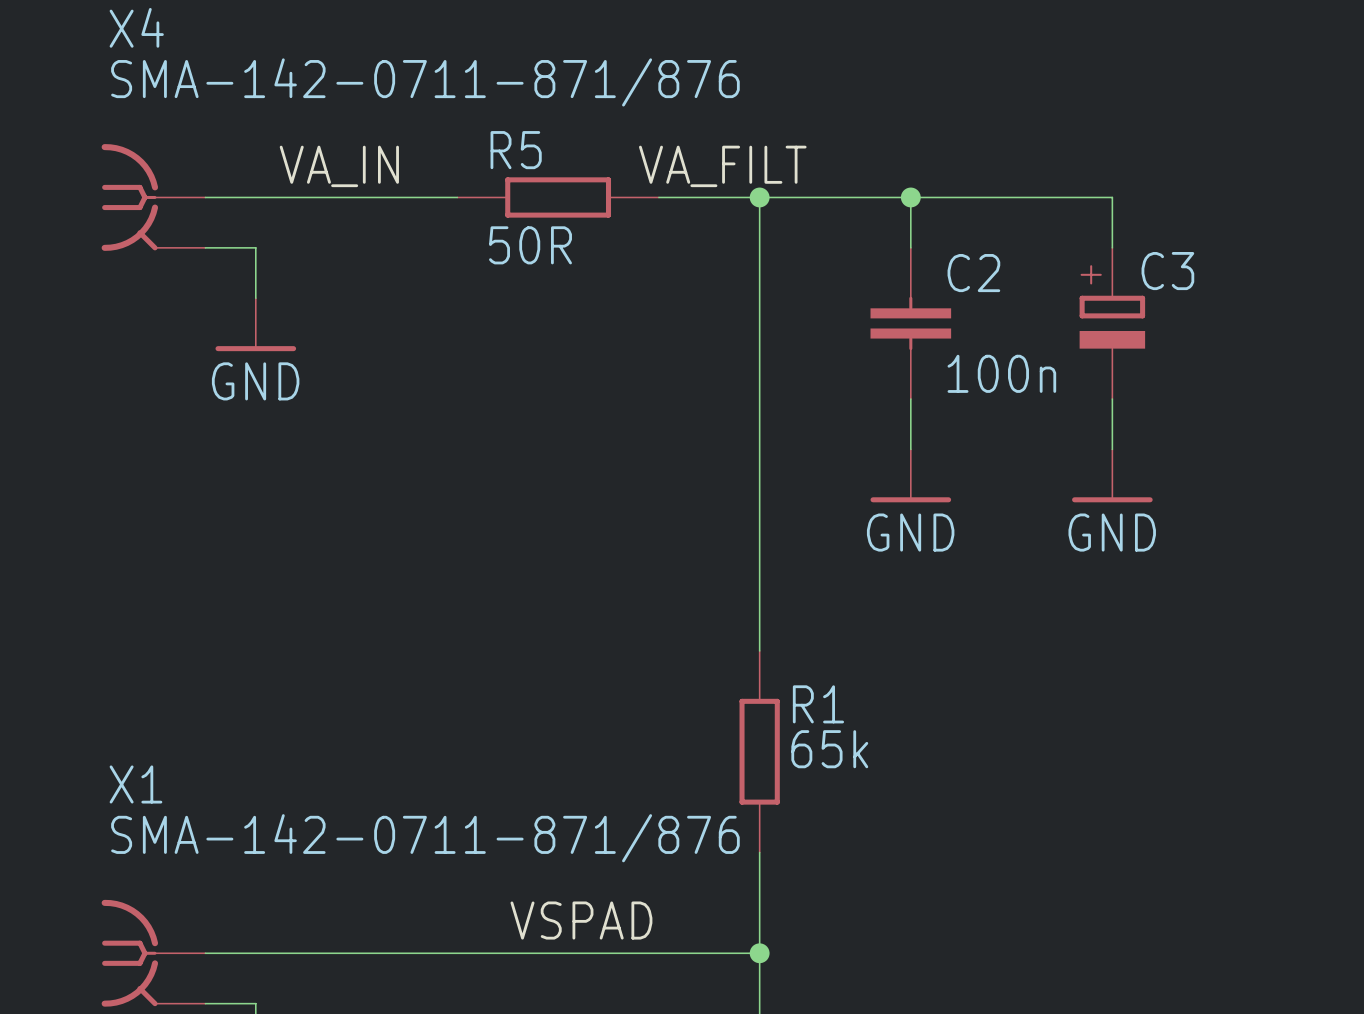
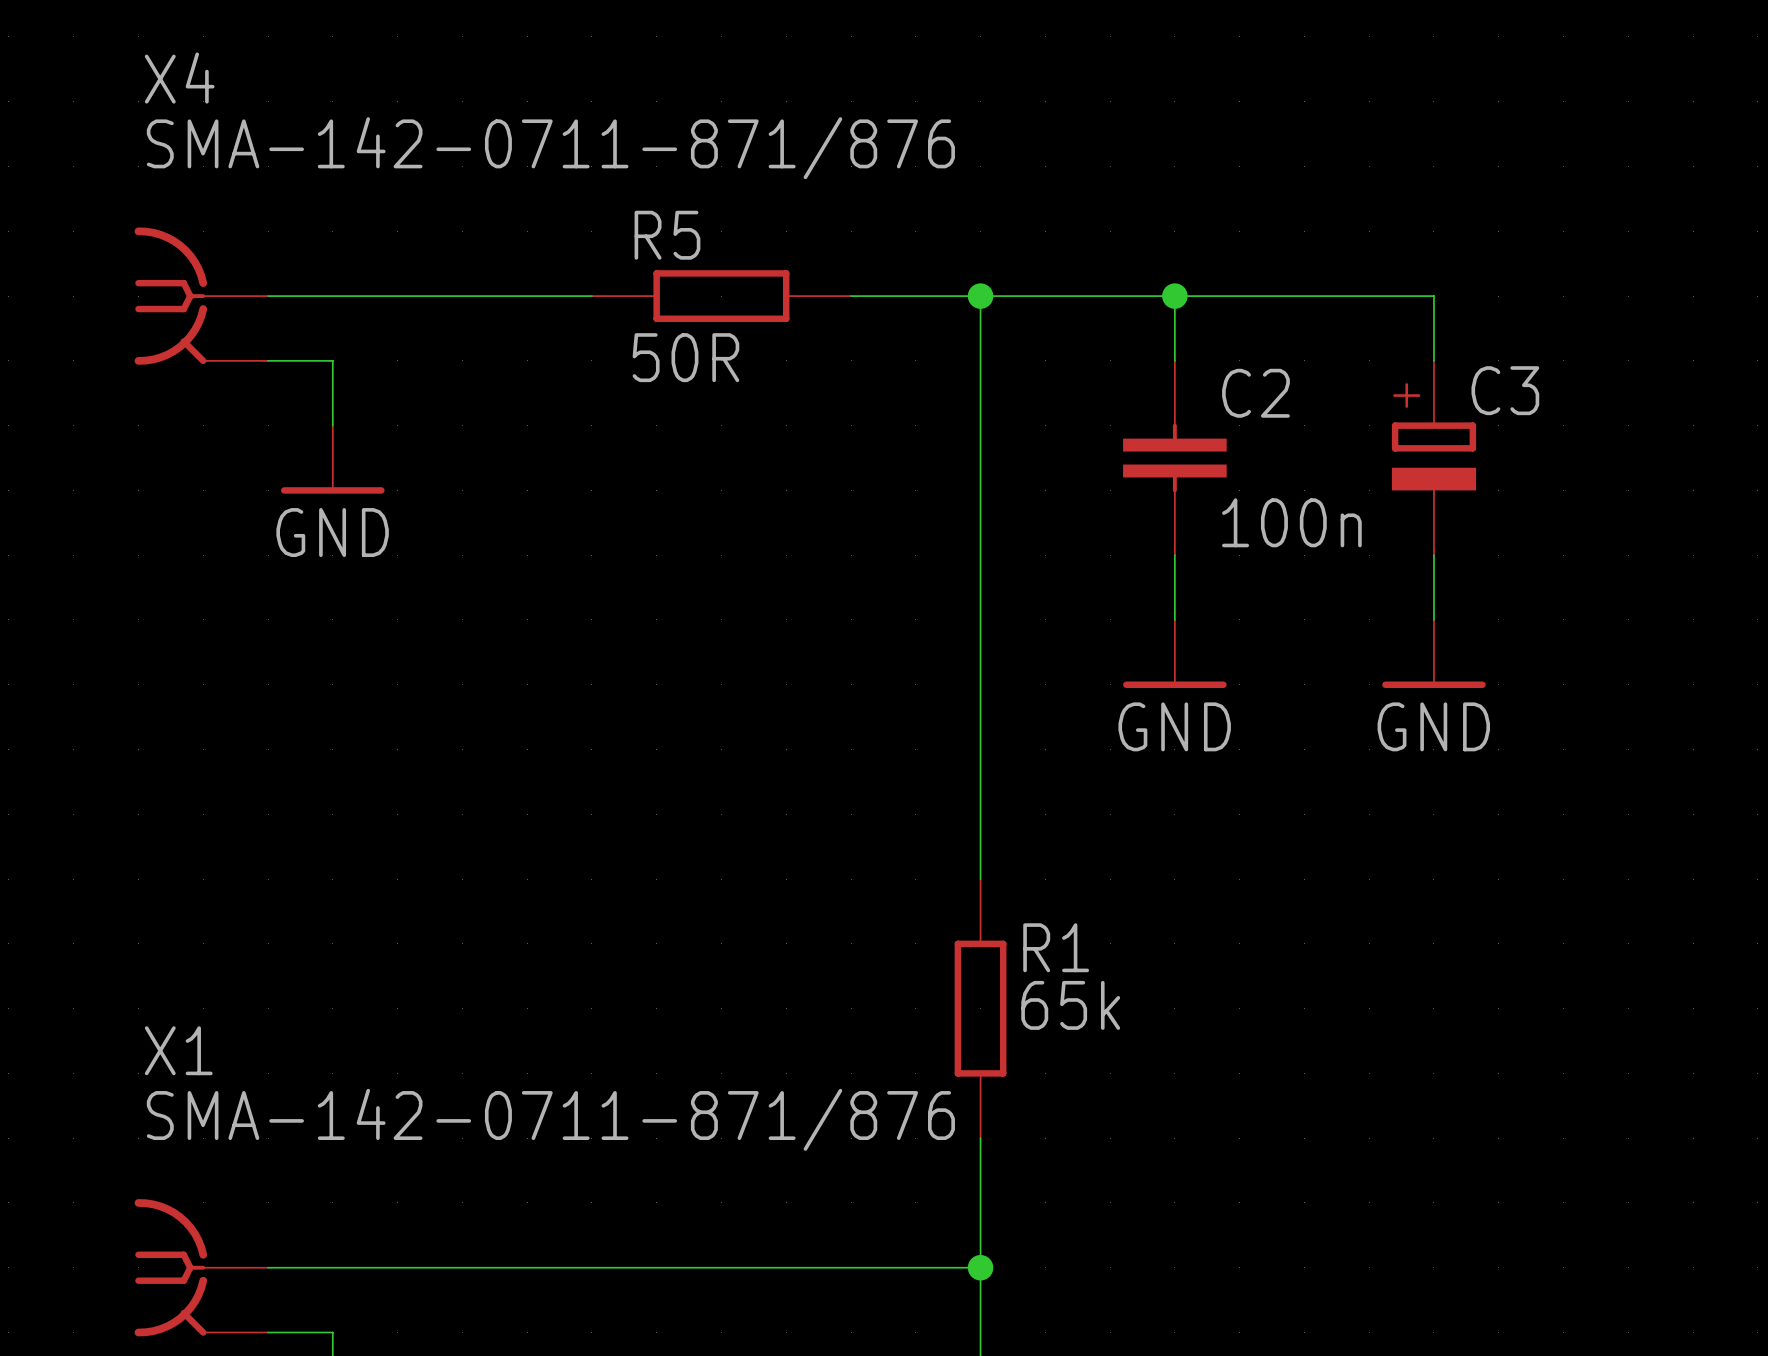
label: VA_IN (339, 166) -> none
label: VA_FILT (722, 166) -> none
label: VSPAD (581, 920) -> none

